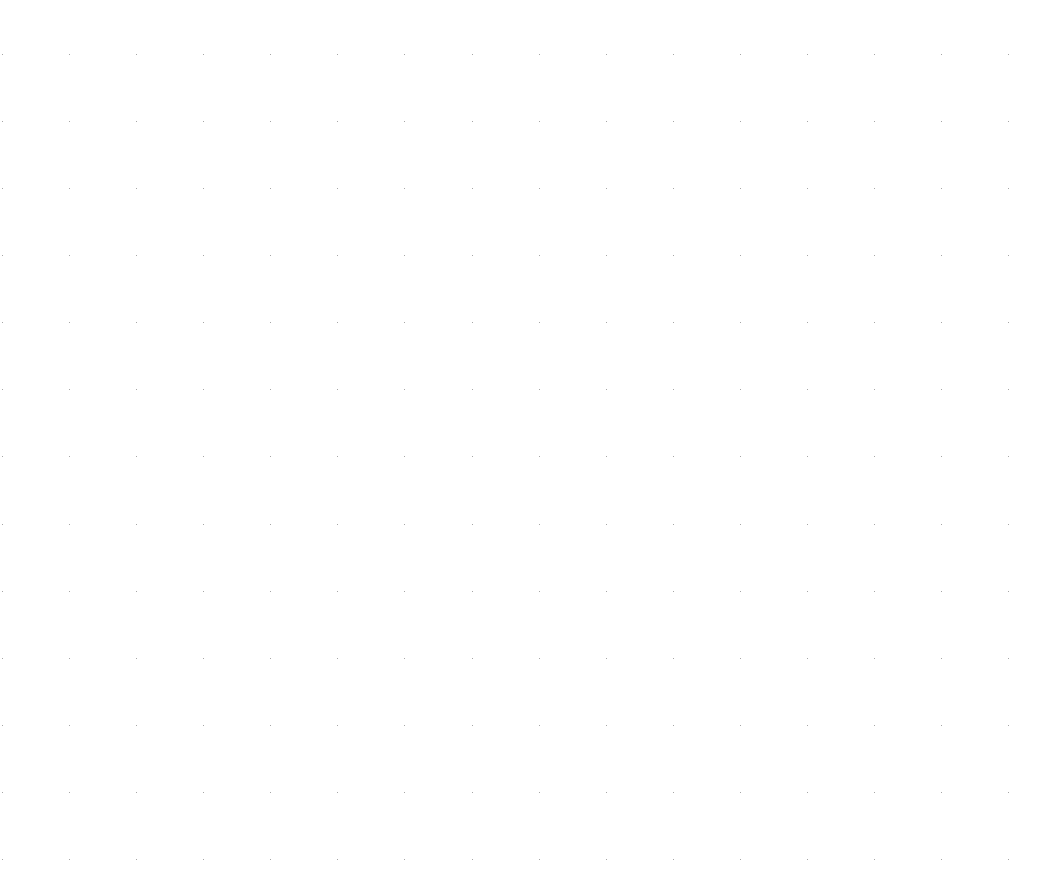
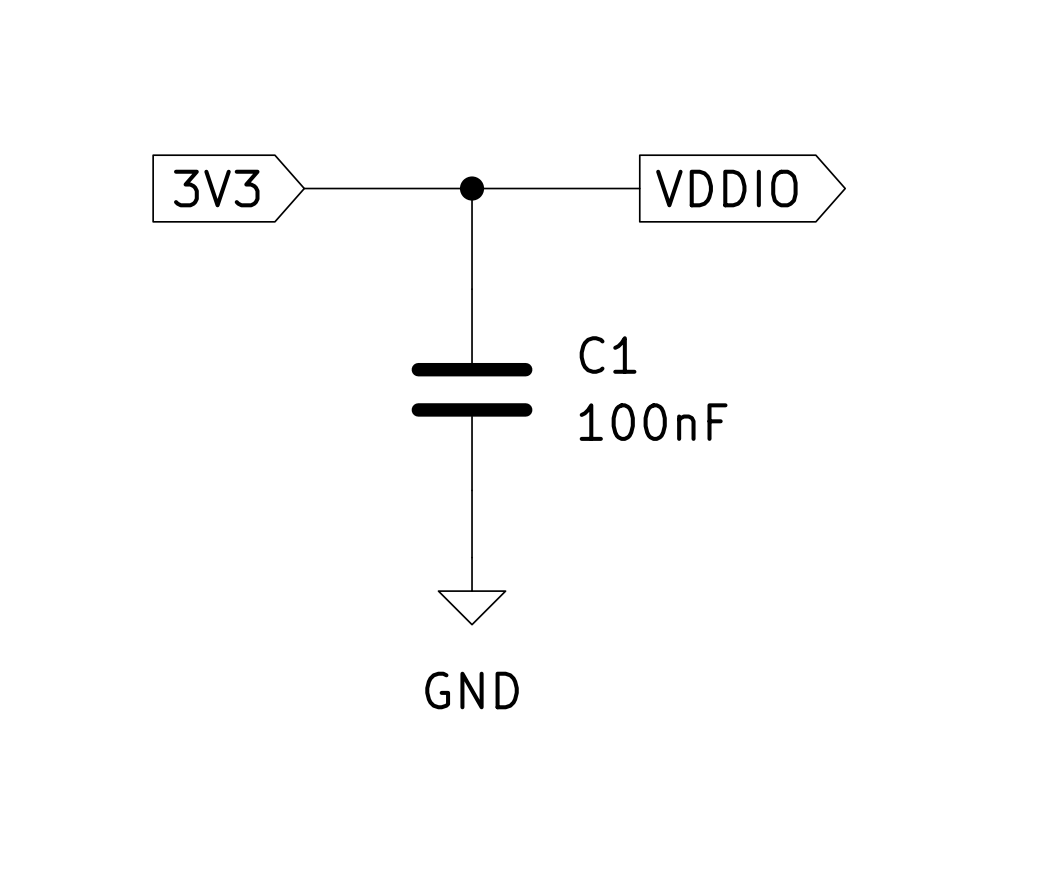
global label: none -> 3V3 (216, 188)
wire: none -> (304, 188) (639, 188)
wire: none -> (472, 188) (472, 289)
junction: none -> (472, 188)
global label: none -> VDDIO (726, 188)
C1: none -> 100nF (472, 389)
wire: none -> (472, 490) (472, 557)
power symbol: none -> GND (472, 591)

